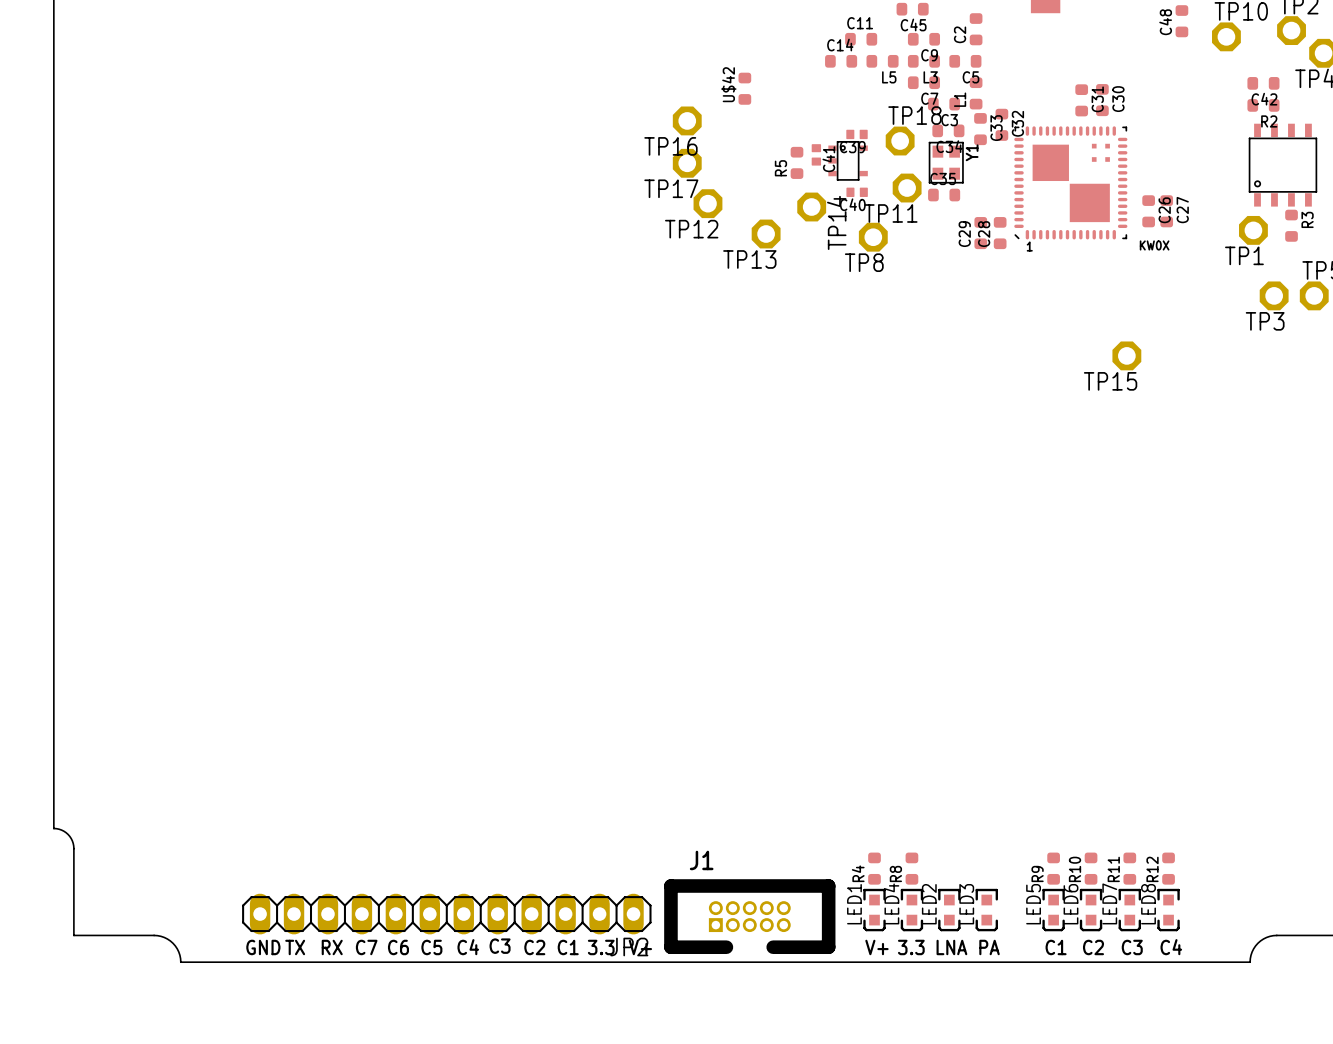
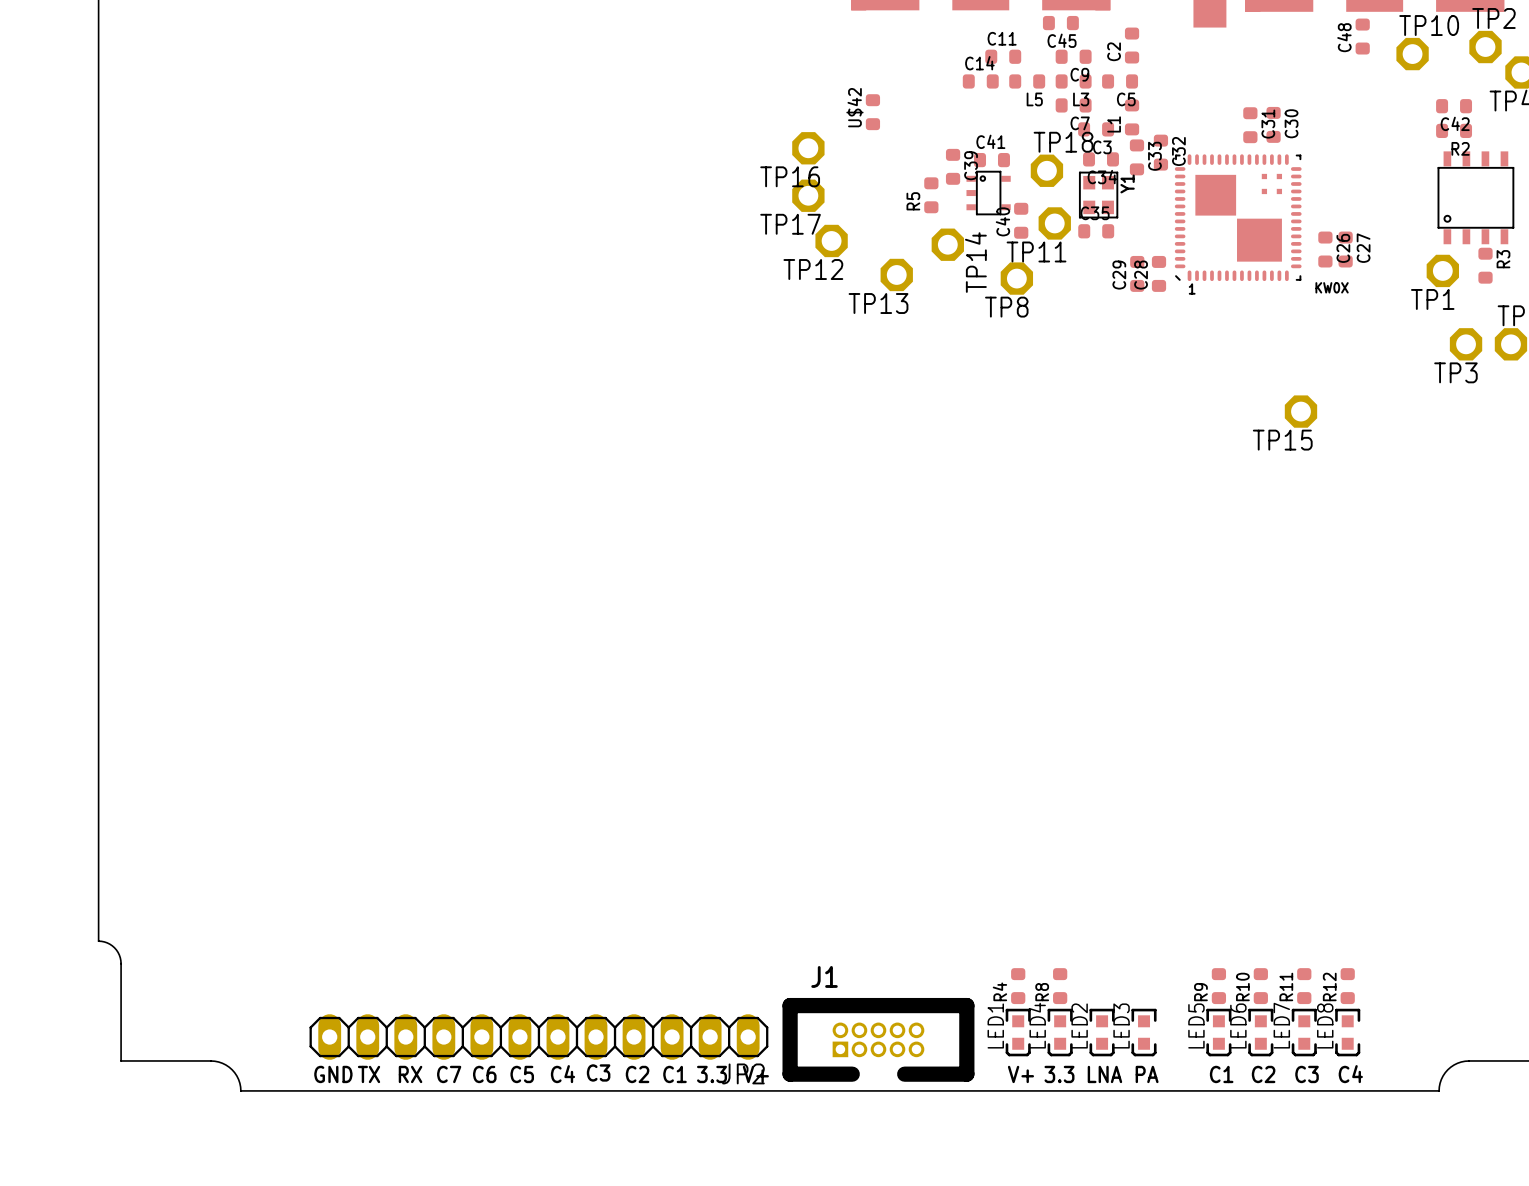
C39 footprint: [846, 129, 868, 140] -> [945, 148, 961, 185]
C41 footprint: [811, 144, 822, 166] -> [974, 152, 1010, 168]
C40 footprint: [846, 187, 868, 197] -> [1014, 202, 1029, 239]

